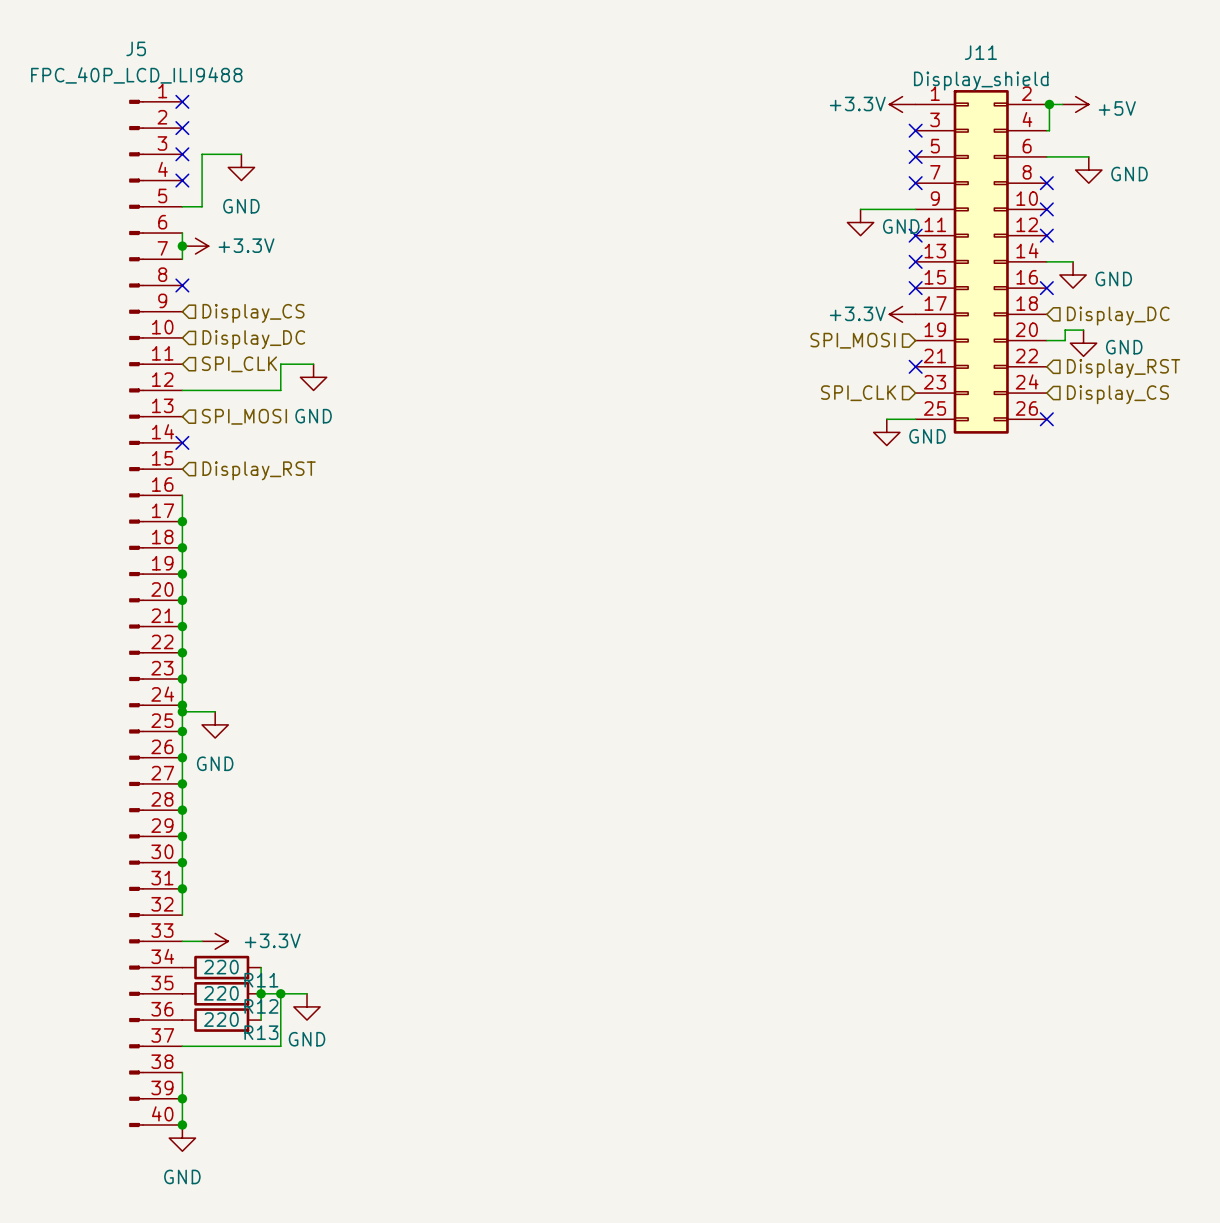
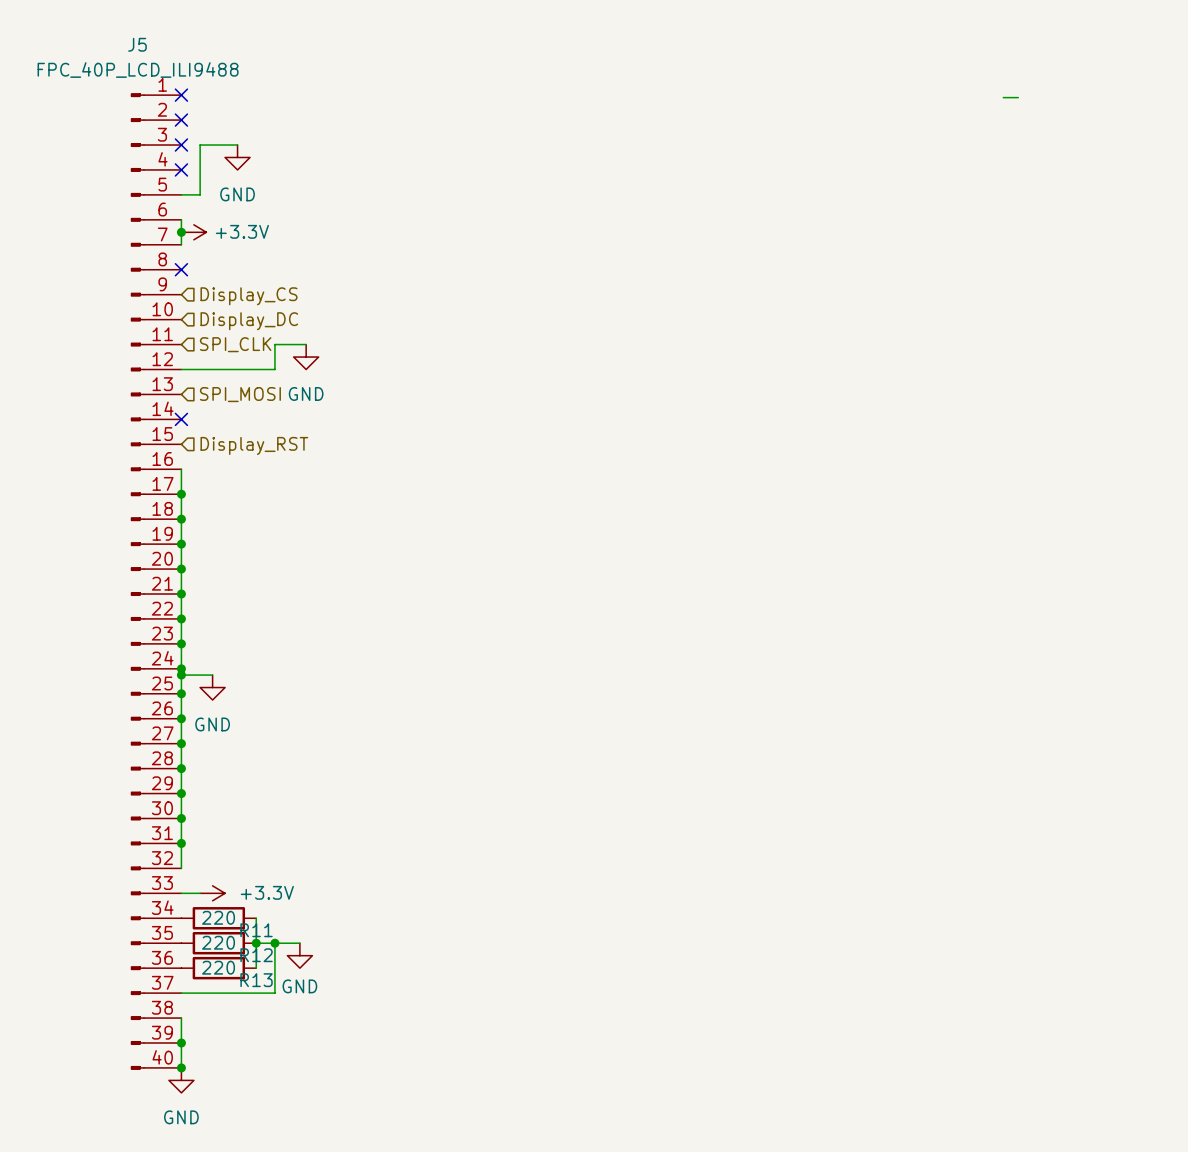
power symbol: +3.3V (902, 104) -> none
wire: (1049, 104) (1049, 130) (1046, 130) -> none
junction: (1049, 104) -> none
power symbol: +5V (1075, 104) -> none
no-connect mark: (915, 130) -> none
no-connect mark: (915, 156) -> none
wire: (1046, 156) (1088, 156) -> none
power symbol: GND (1088, 170) -> none
no-connect mark: (915, 183) -> none
no-connect mark: (1046, 183) -> none
wire: (860, 209) (915, 209) -> none
no-connect mark: (1046, 209) -> none
power symbol: GND (860, 222) -> none
no-connect mark: (915, 235) -> none
no-connect mark: (1046, 235) -> none
no-connect mark: (915, 261) -> none
J11: Display_shield (981, 261) -> none
wire: (1046, 261) (1073, 261) -> none
power symbol: GND (1073, 274) -> none
no-connect mark: (915, 288) -> none
no-connect mark: (1046, 288) -> none
power symbol: +3.3V (902, 314) -> none
hierarchical label: Display_DC (1118, 316) -> none
wire: (1083, 330) (1065, 330) (1065, 340) (1046, 340) -> none
hierarchical label: SPI_MOSI (852, 340) -> none
power symbol: GND (1083, 343) -> none
no-connect mark: (915, 366) -> none
hierarchical label: Display_RST (1123, 368) -> none
hierarchical label: SPI_CLK (858, 393) -> none
hierarchical label: Display_CS (1117, 394) -> none
wire: (886, 419) (915, 419) -> none
no-connect mark: (1046, 419) -> none
power symbol: GND (886, 432) -> none

